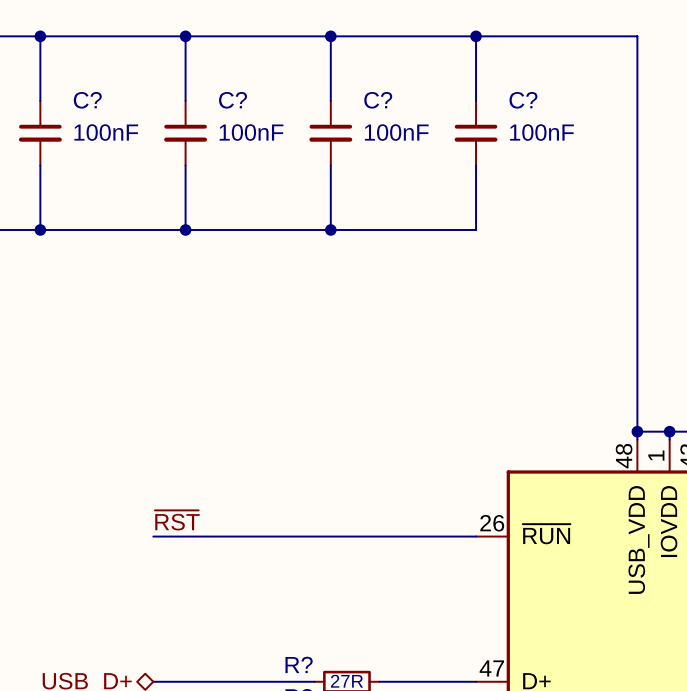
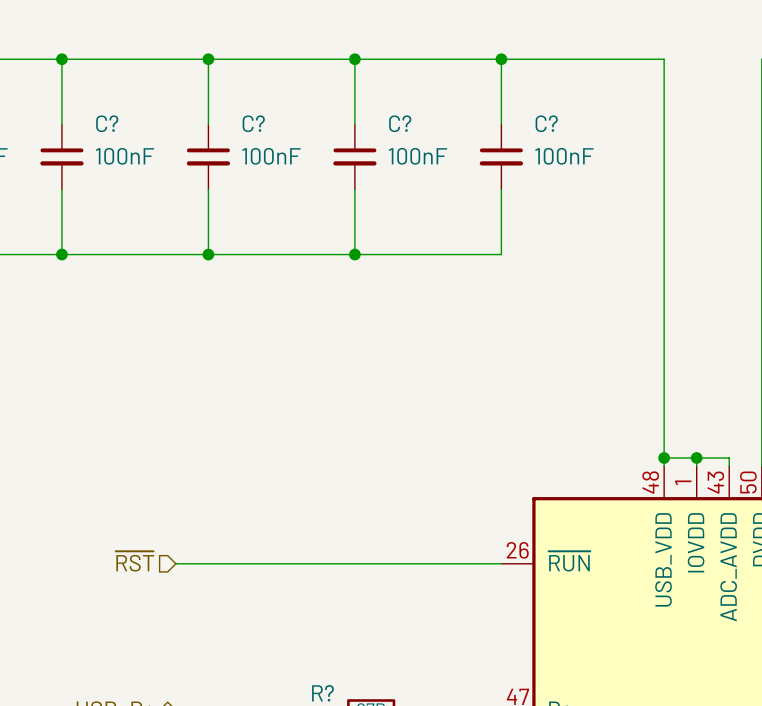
label: ~{RST} (177, 520) -> none
hierarchical label: none -> ~{RST} (135, 561)

